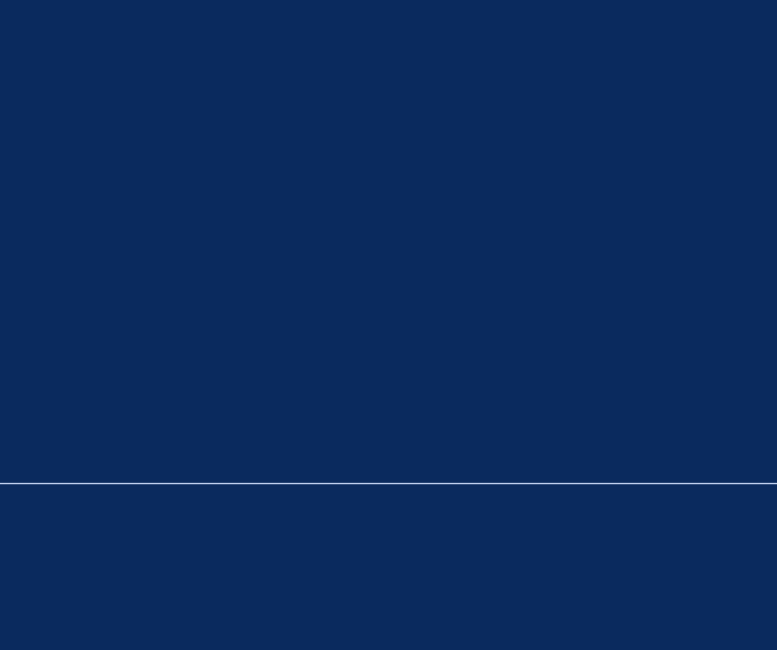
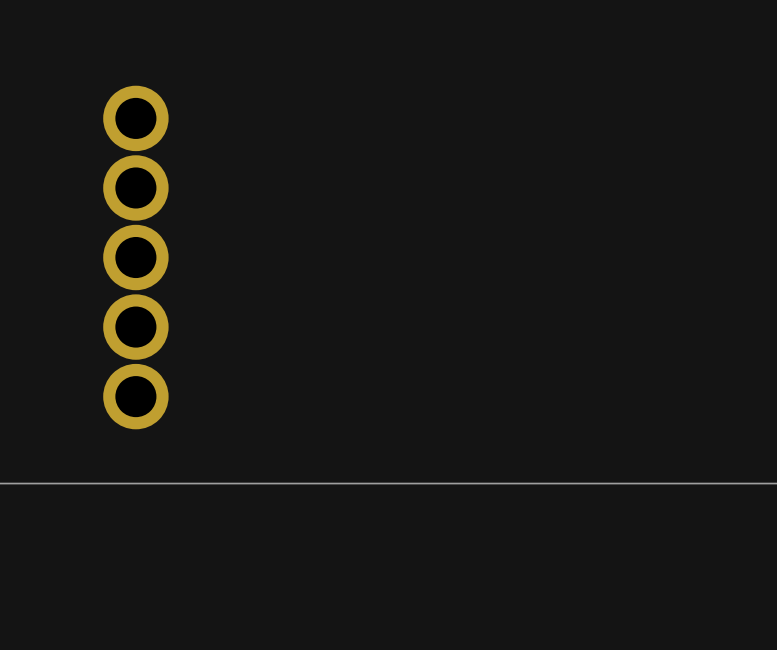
via: none -> (135, 118)
via: none -> (135, 187)
via: none -> (135, 257)
via: none -> (135, 327)
via: none -> (135, 396)

